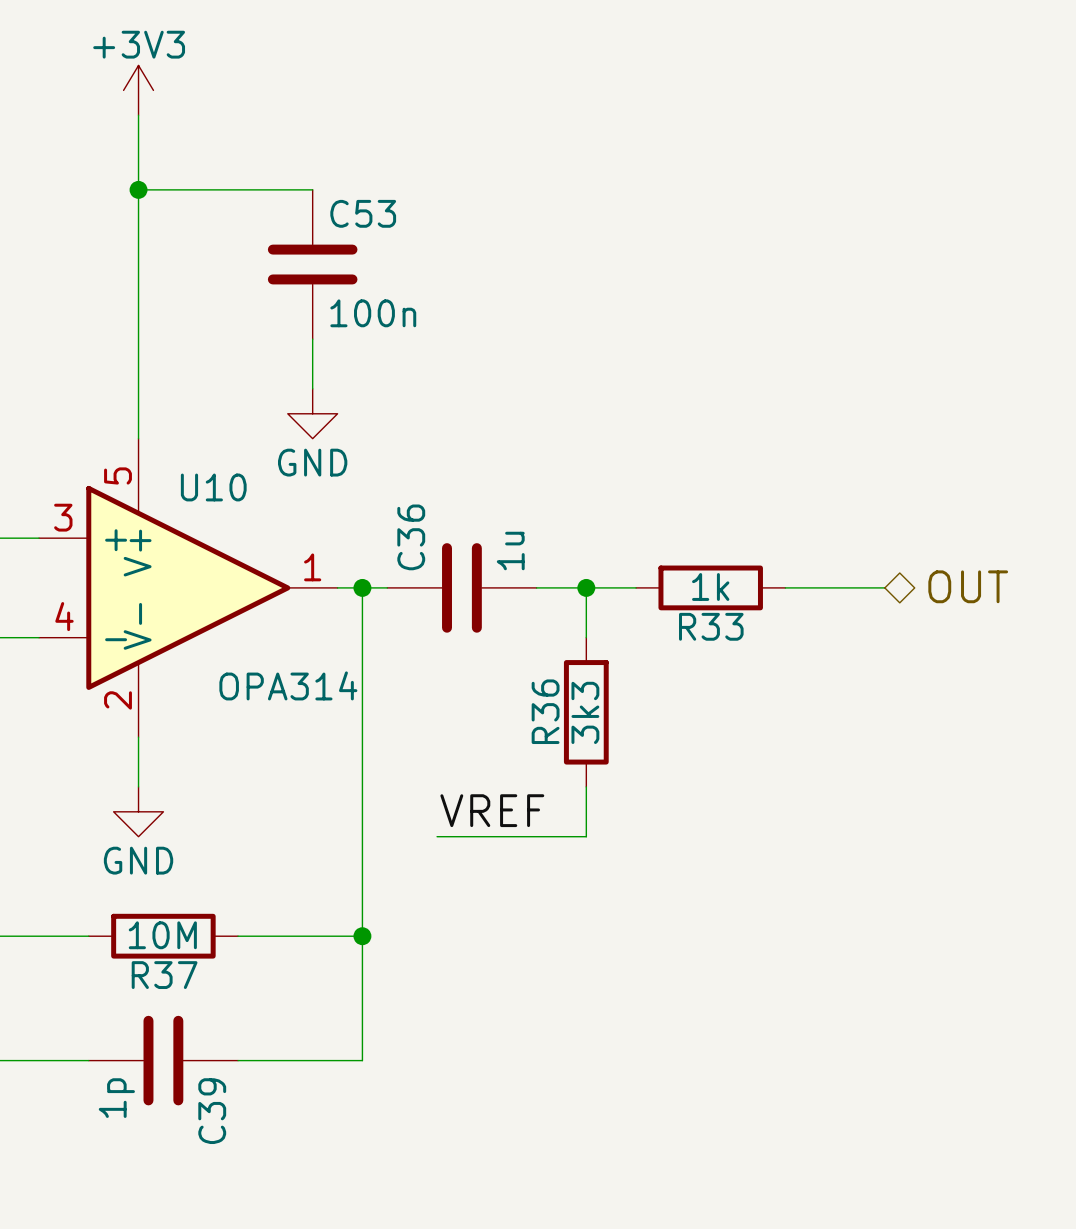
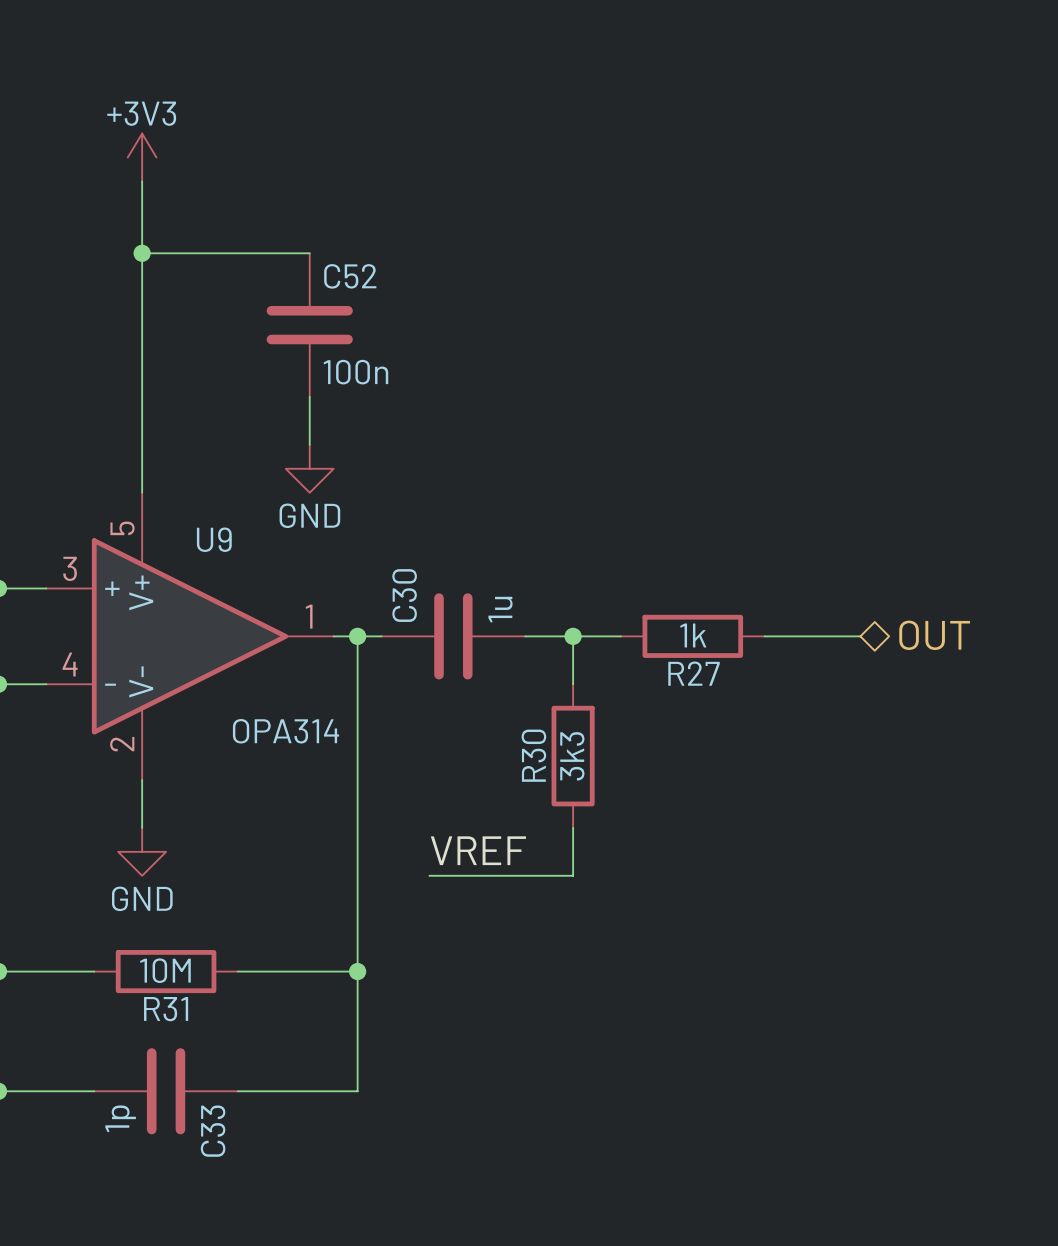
C53 name: C53 (363, 213) -> C52 (350, 276)
U10 name: U10 (213, 487) -> U9 (214, 539)
C36 name: C36 (411, 537) -> C30 (404, 595)
R33 name: R33 (711, 626) -> R27 (694, 673)
R36 name: R36 (545, 711) -> R30 (533, 755)
R37 name: R37 (164, 975) -> R31 (166, 1009)
C39 name: C39 (212, 1111) -> C33 (213, 1131)

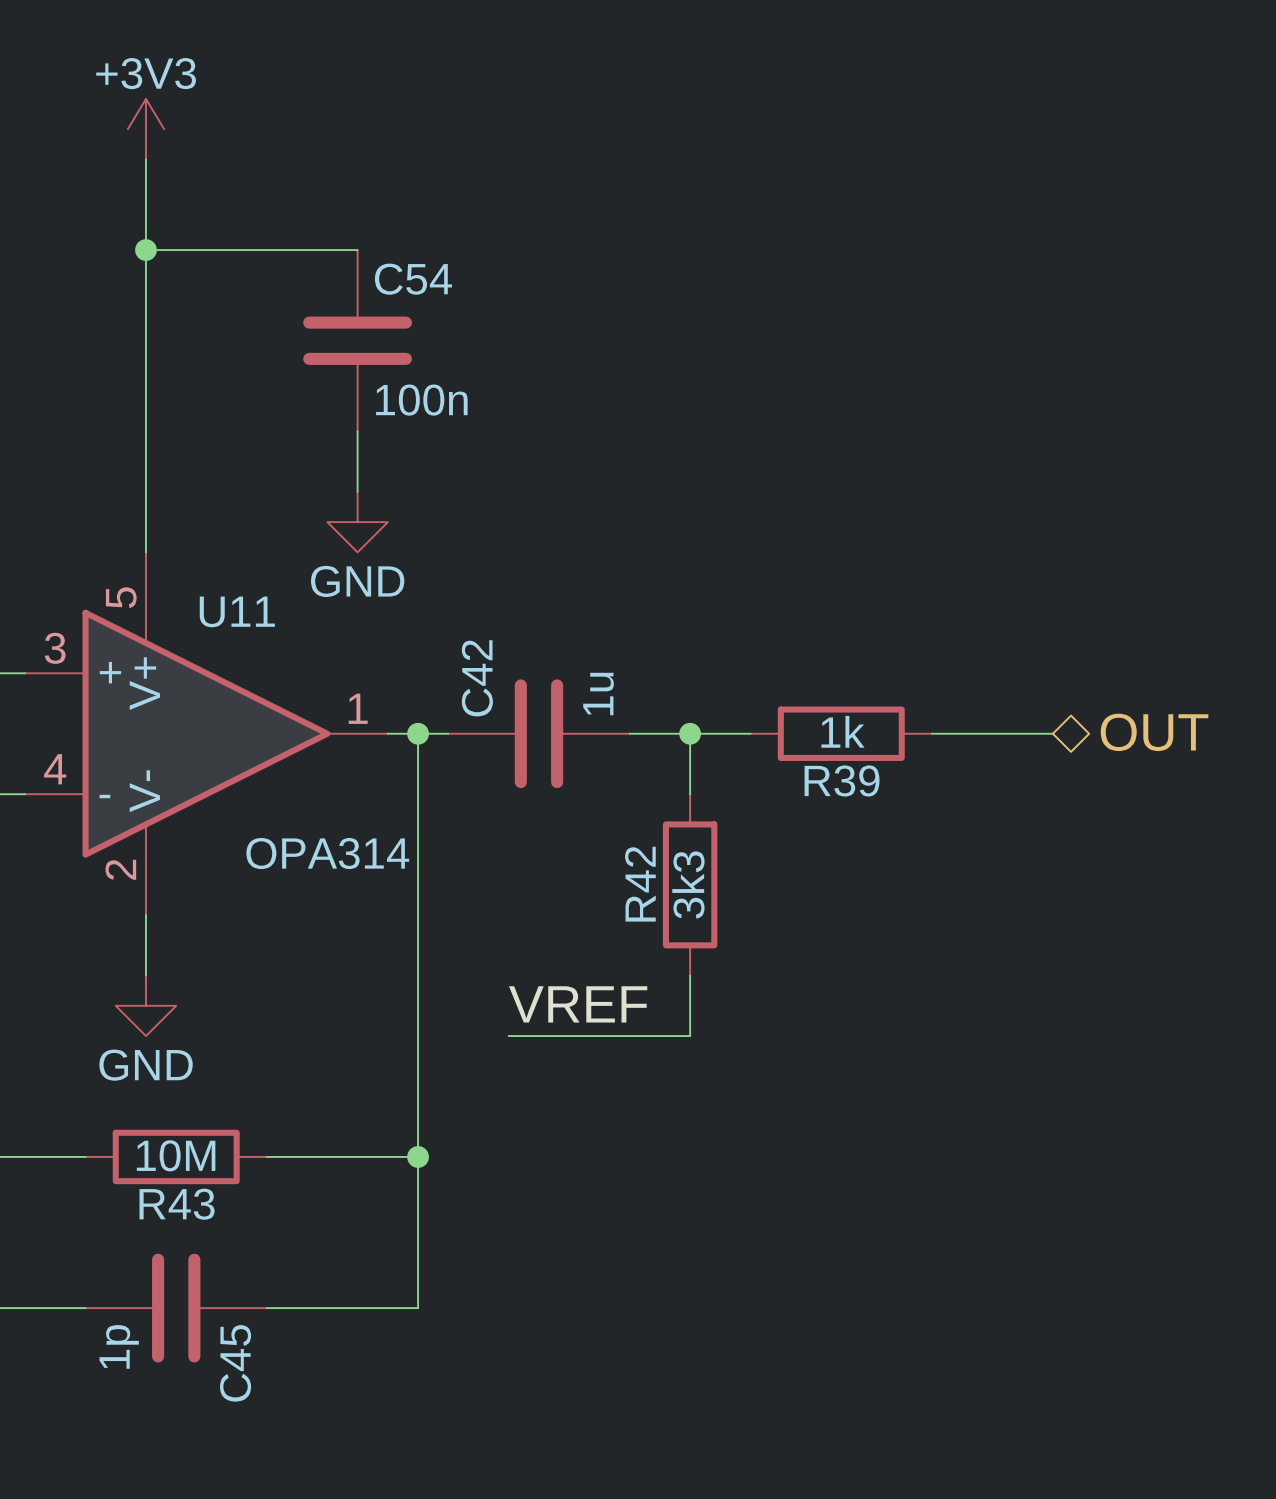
C52 name: C52 (350, 276) -> C54 (413, 279)
U9 name: U9 (214, 539) -> U11 (237, 611)
C30 name: C30 (404, 595) -> C42 (477, 678)
R27 name: R27 (694, 673) -> R39 (842, 780)
R30 name: R30 (533, 755) -> R42 (640, 884)
R31 name: R31 (166, 1009) -> R43 (177, 1204)
C33 name: C33 (213, 1131) -> C45 (235, 1363)

